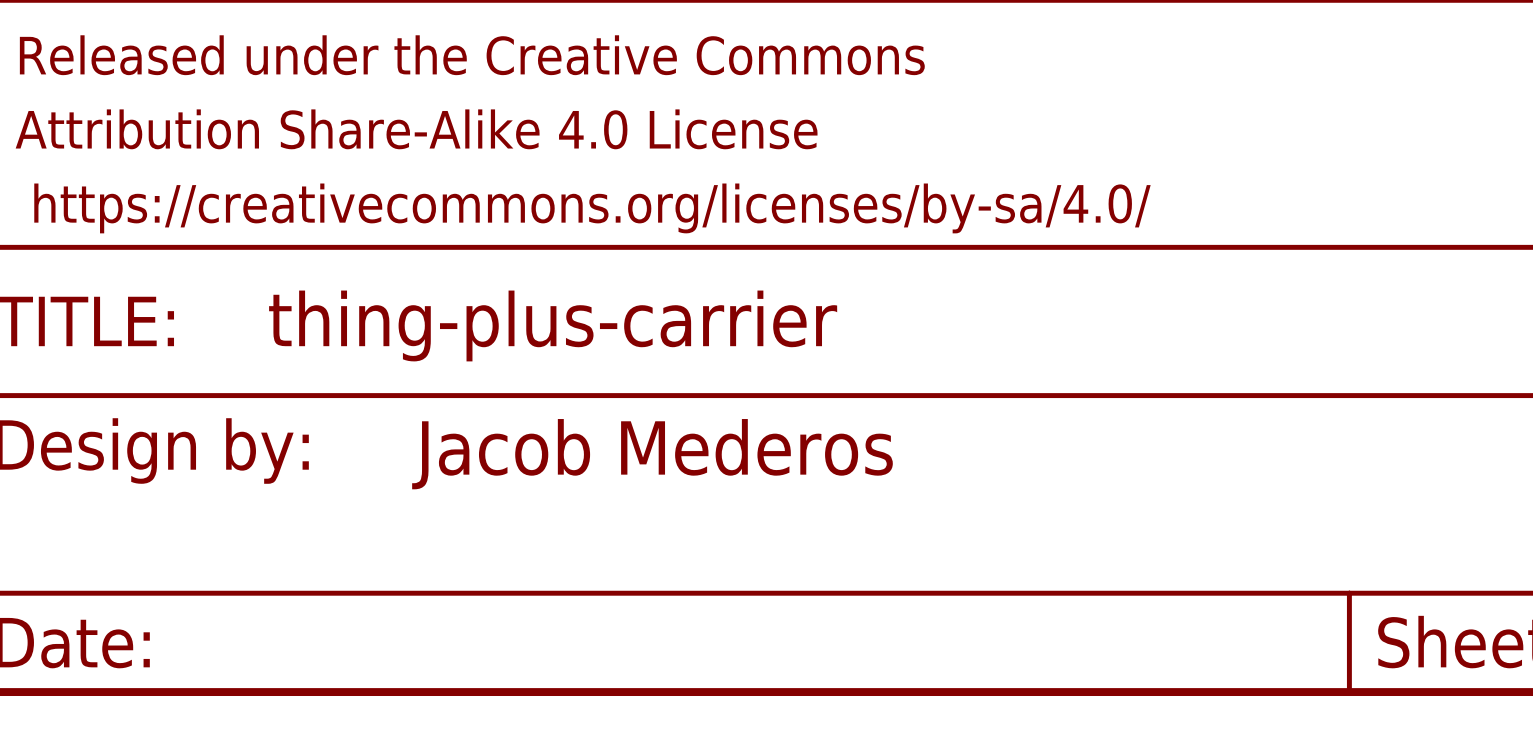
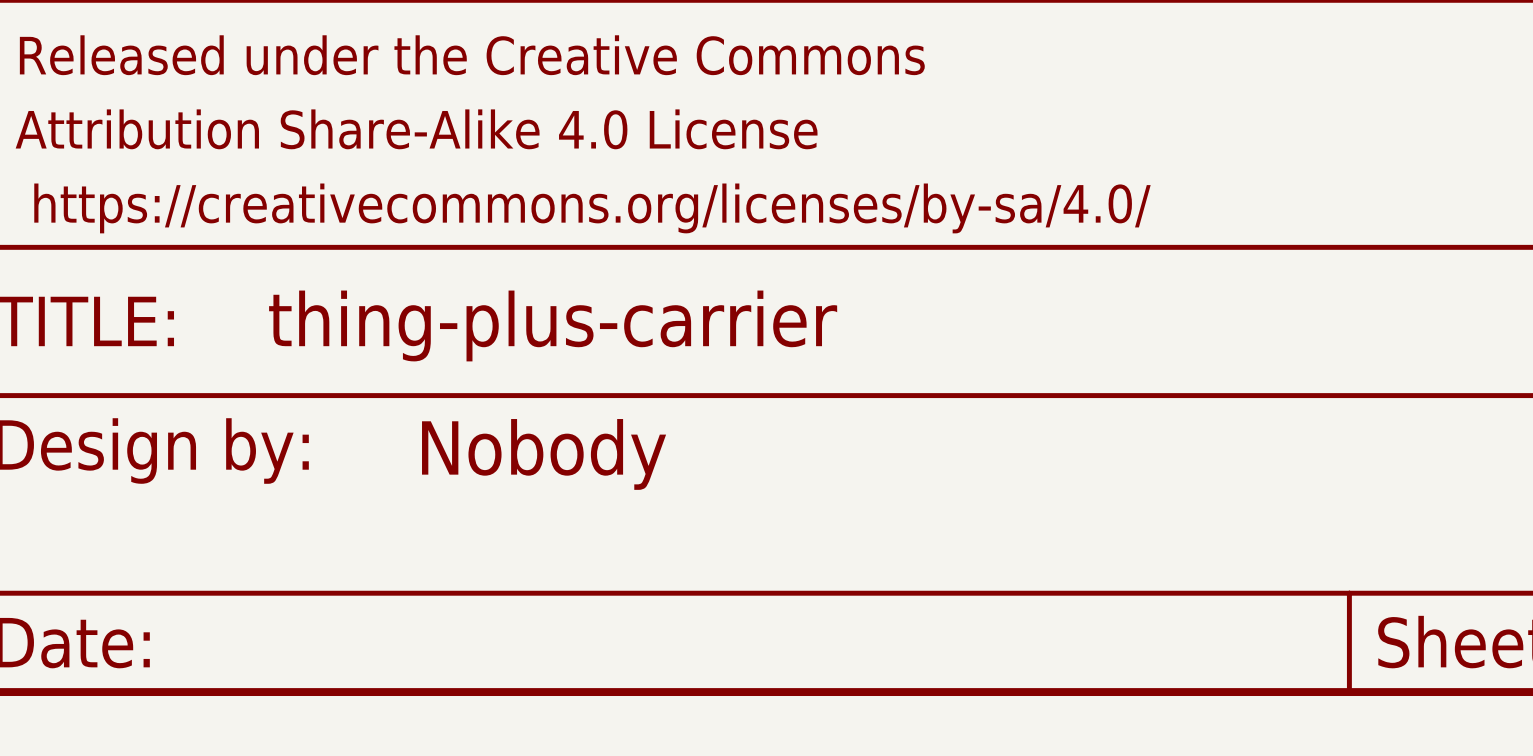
part text: Jacob Mederos (652, 454) -> Nobody (544, 454)

